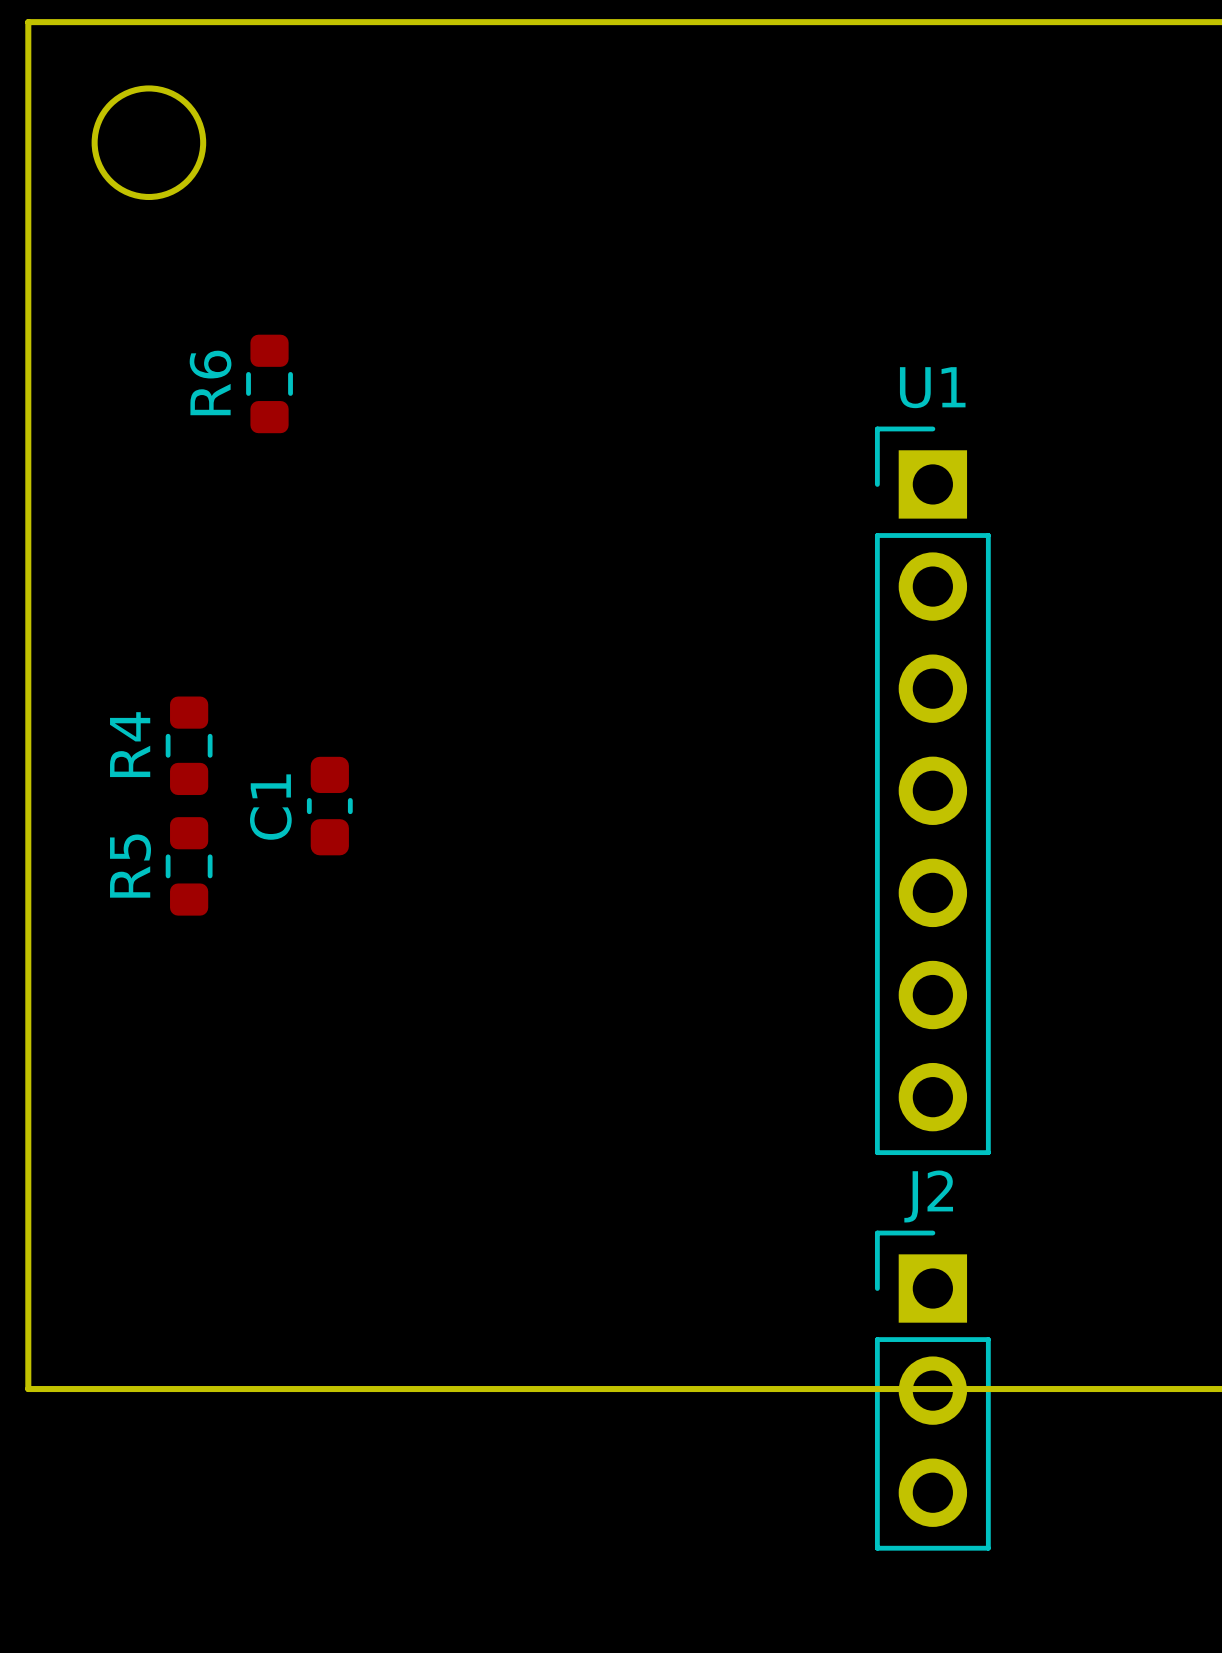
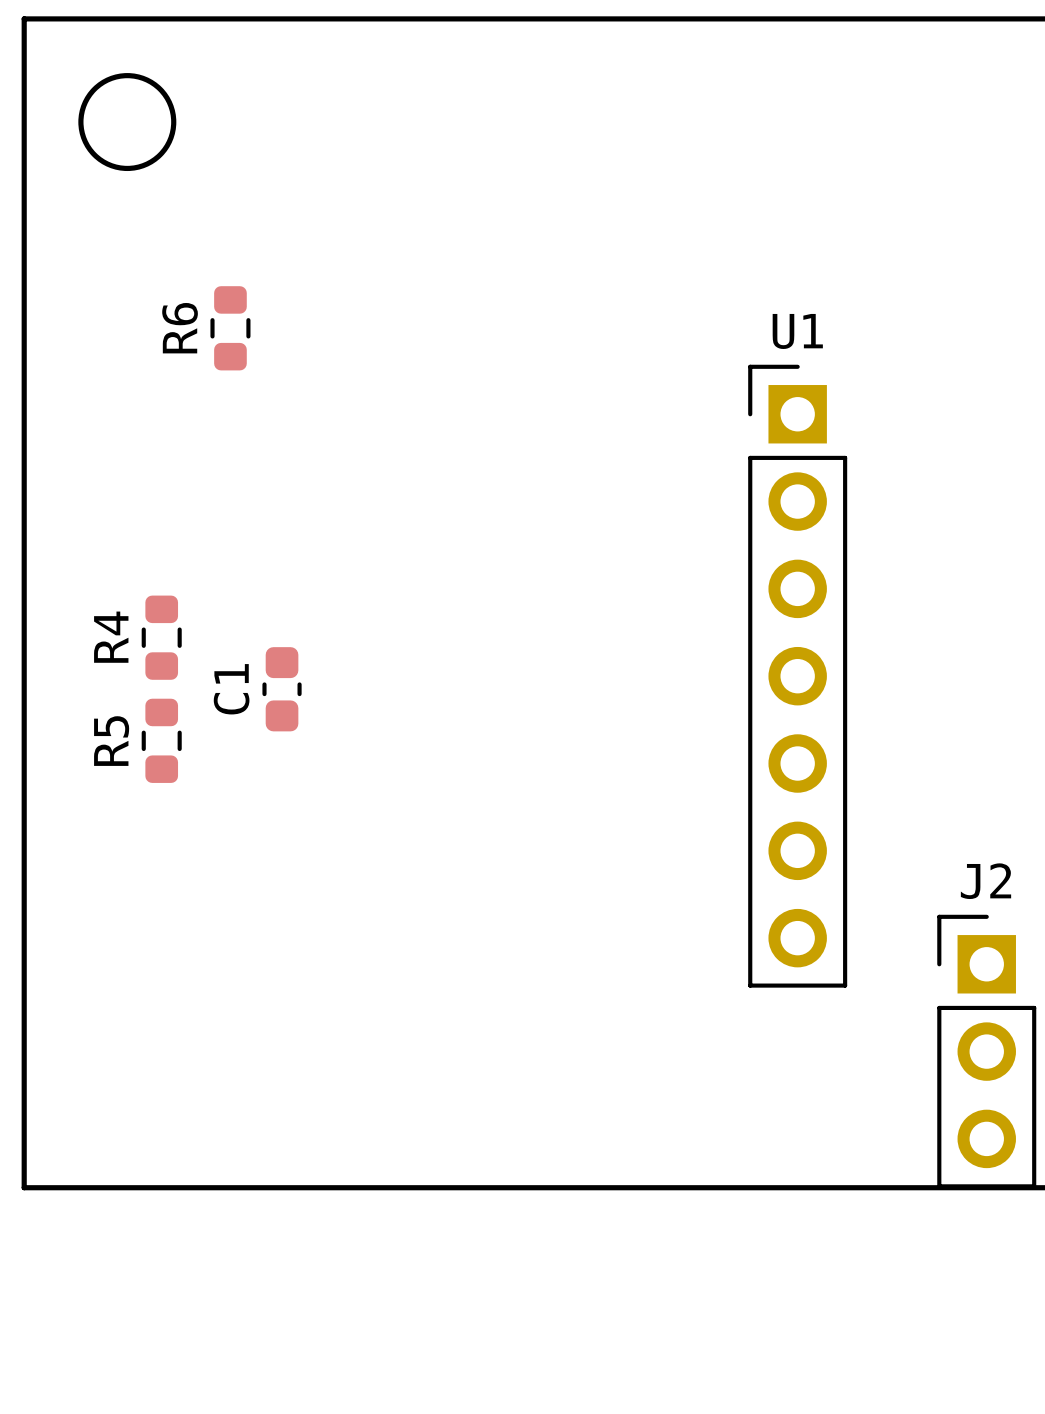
J2 position: (932, 1390) -> (986, 1051)

